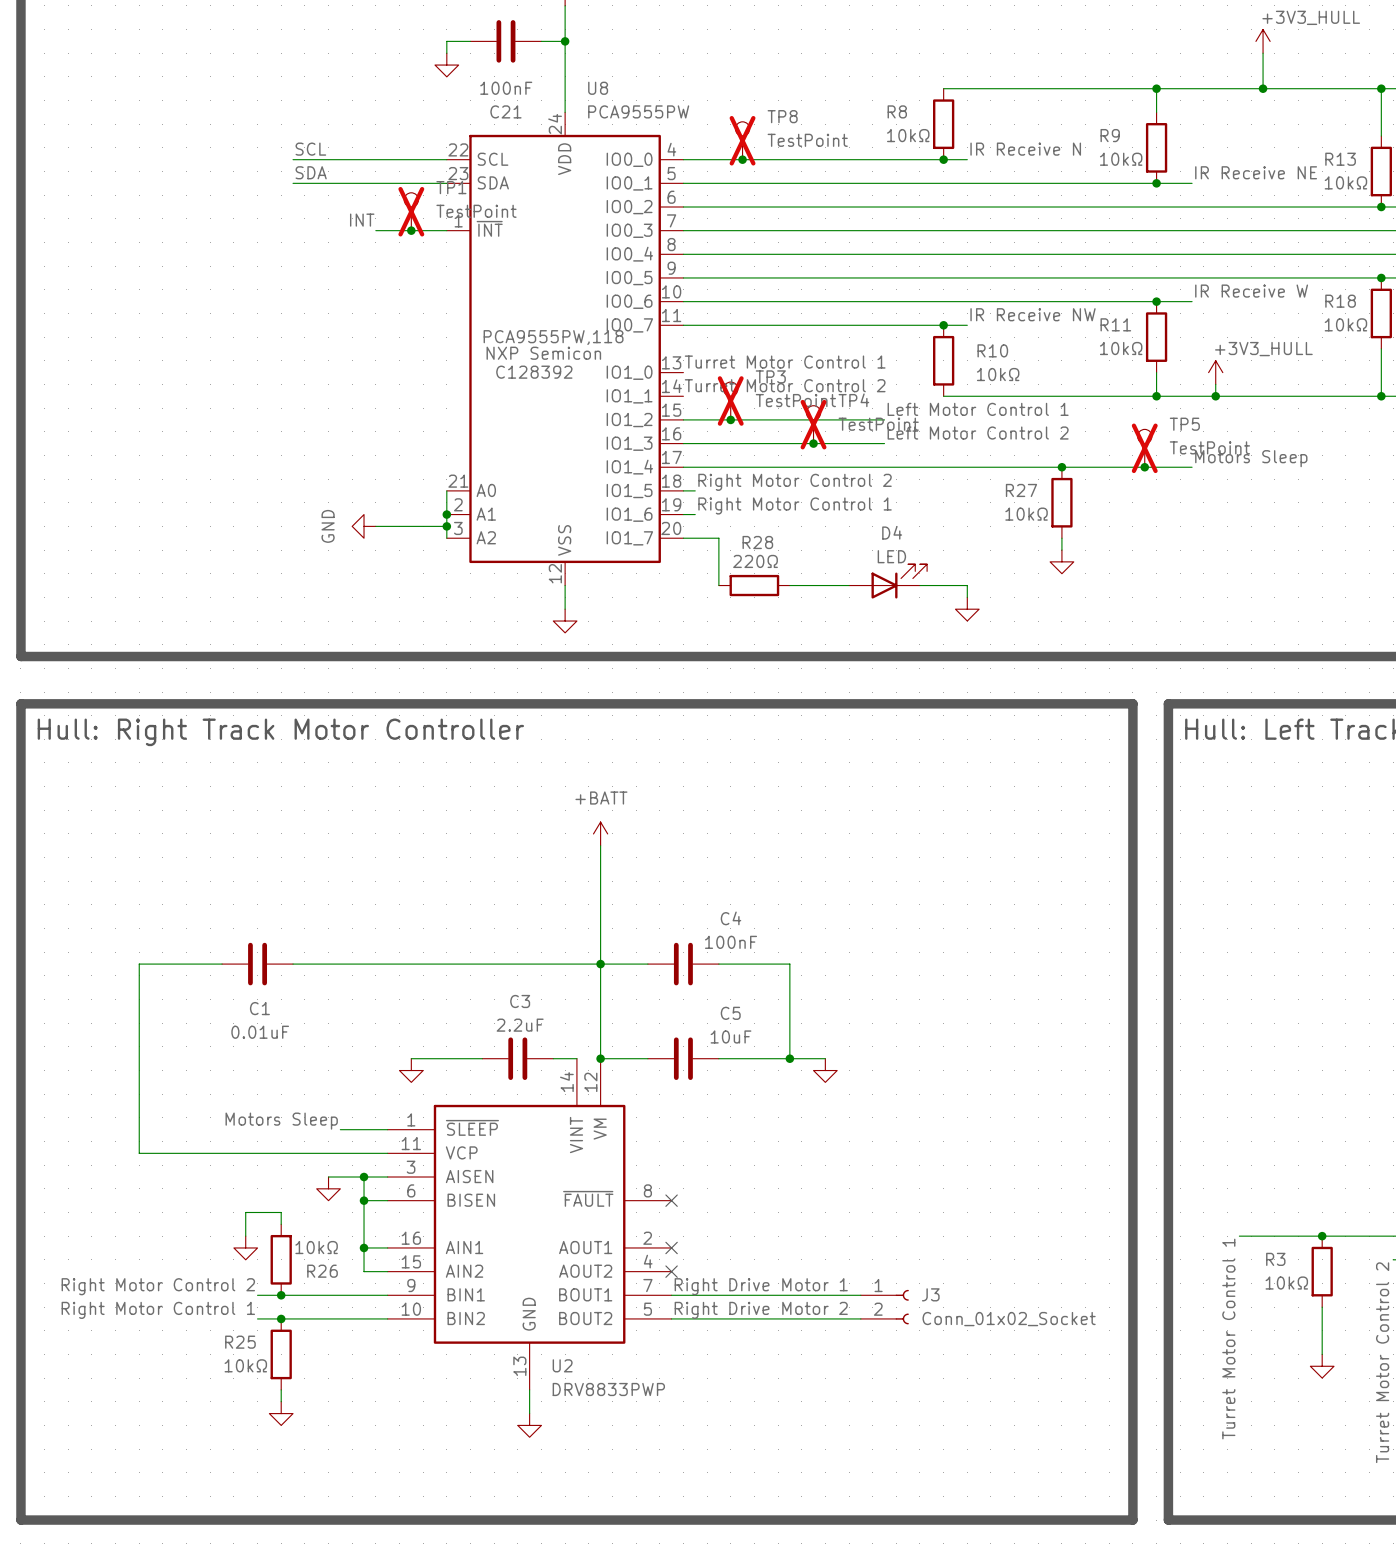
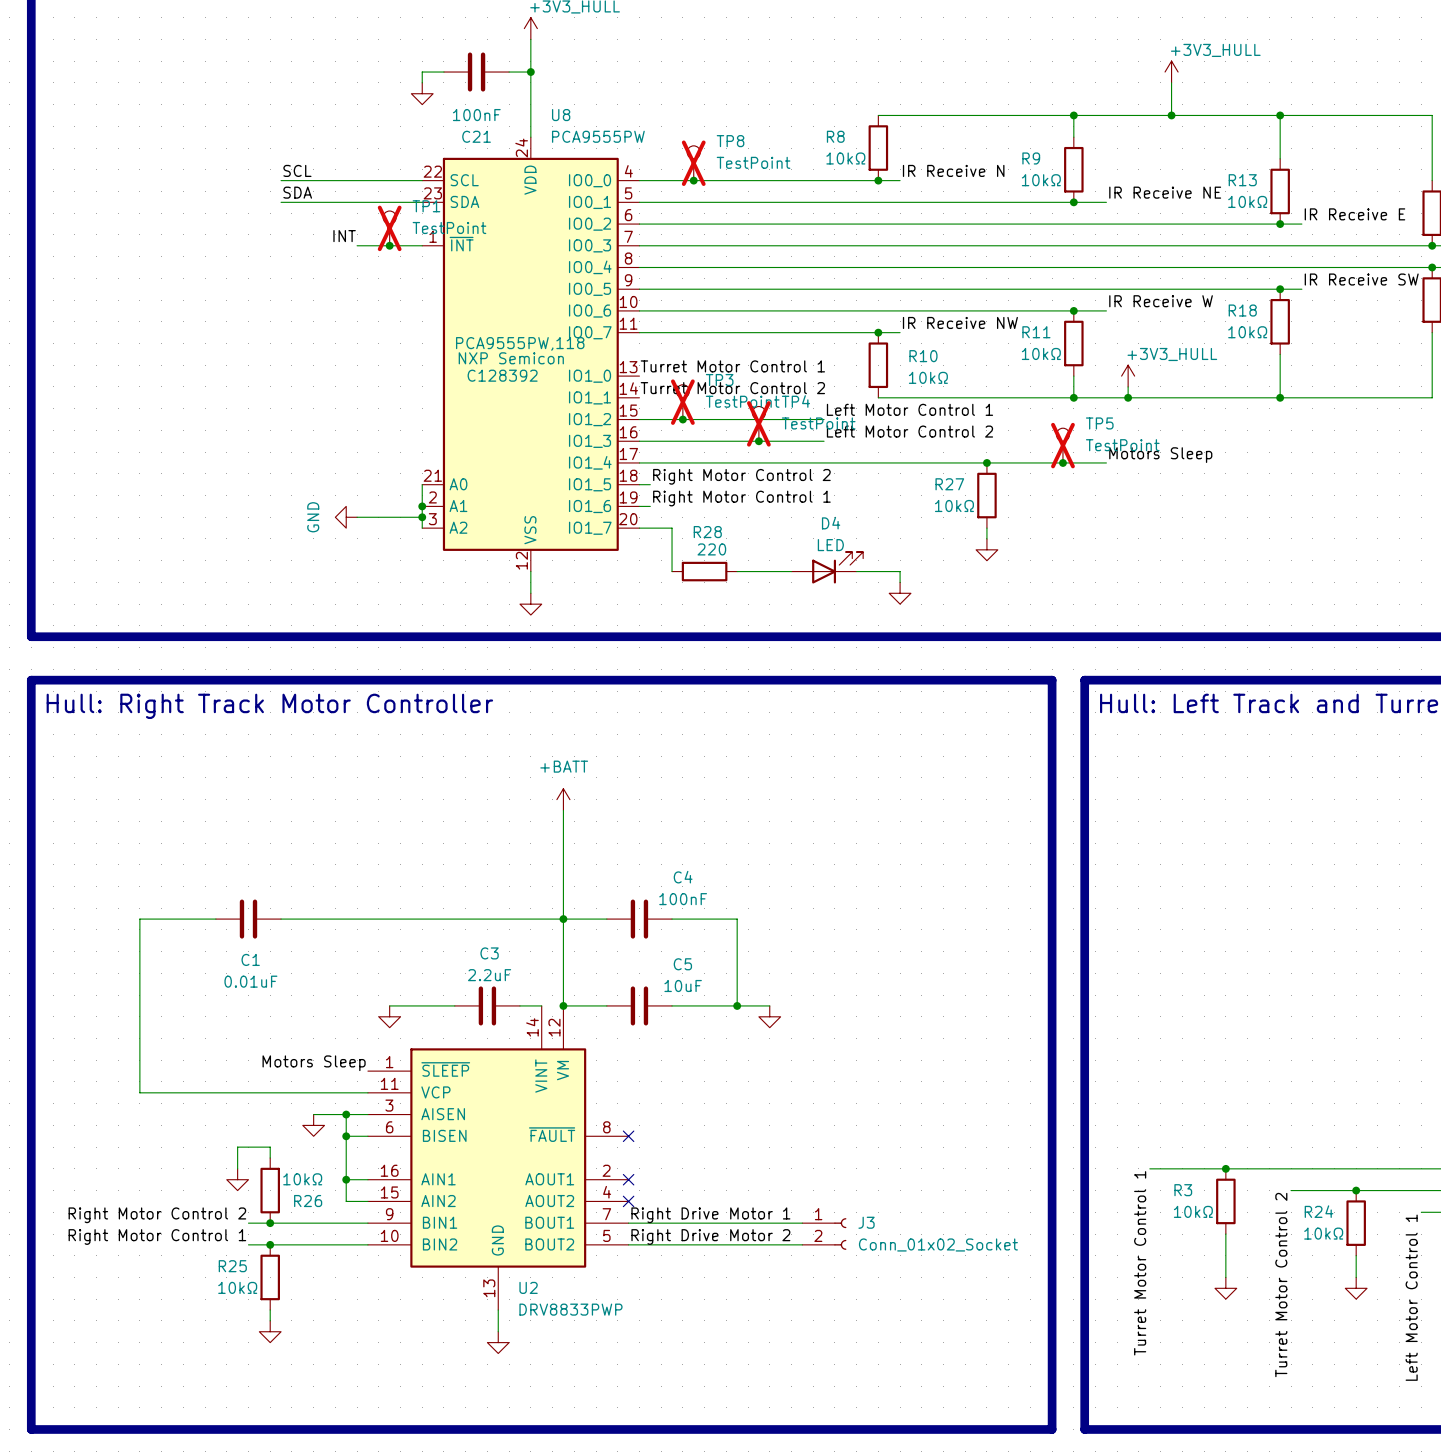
R28 value: 220Ω (755, 561) -> 220 (711, 549)
label position: Motors Sleep (281, 1121) -> Motors Sleep (314, 1063)
wire: (340, 1129) (387, 1129) -> none

